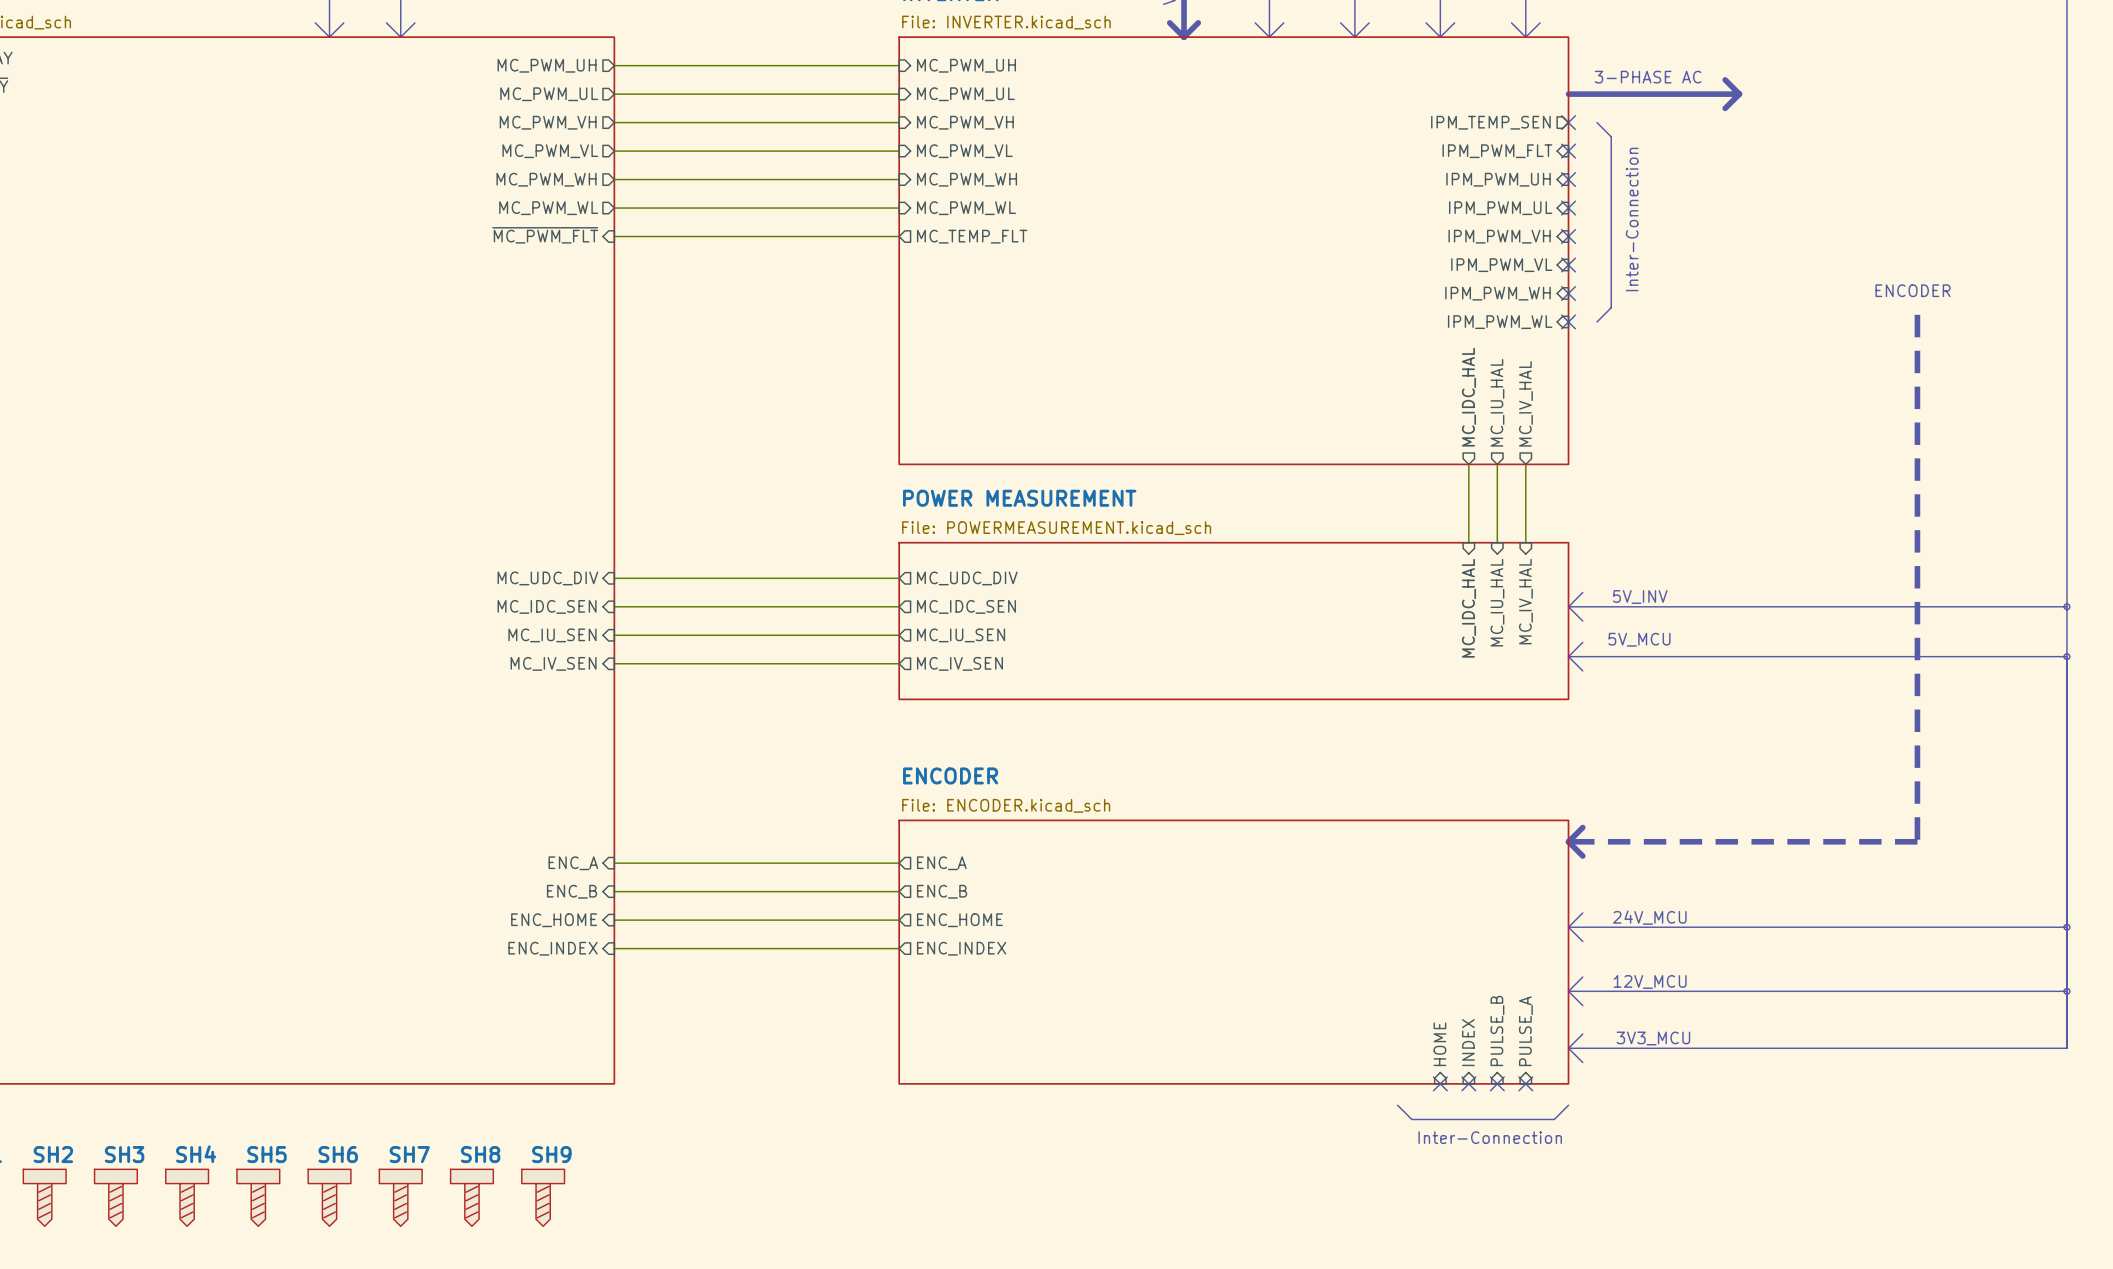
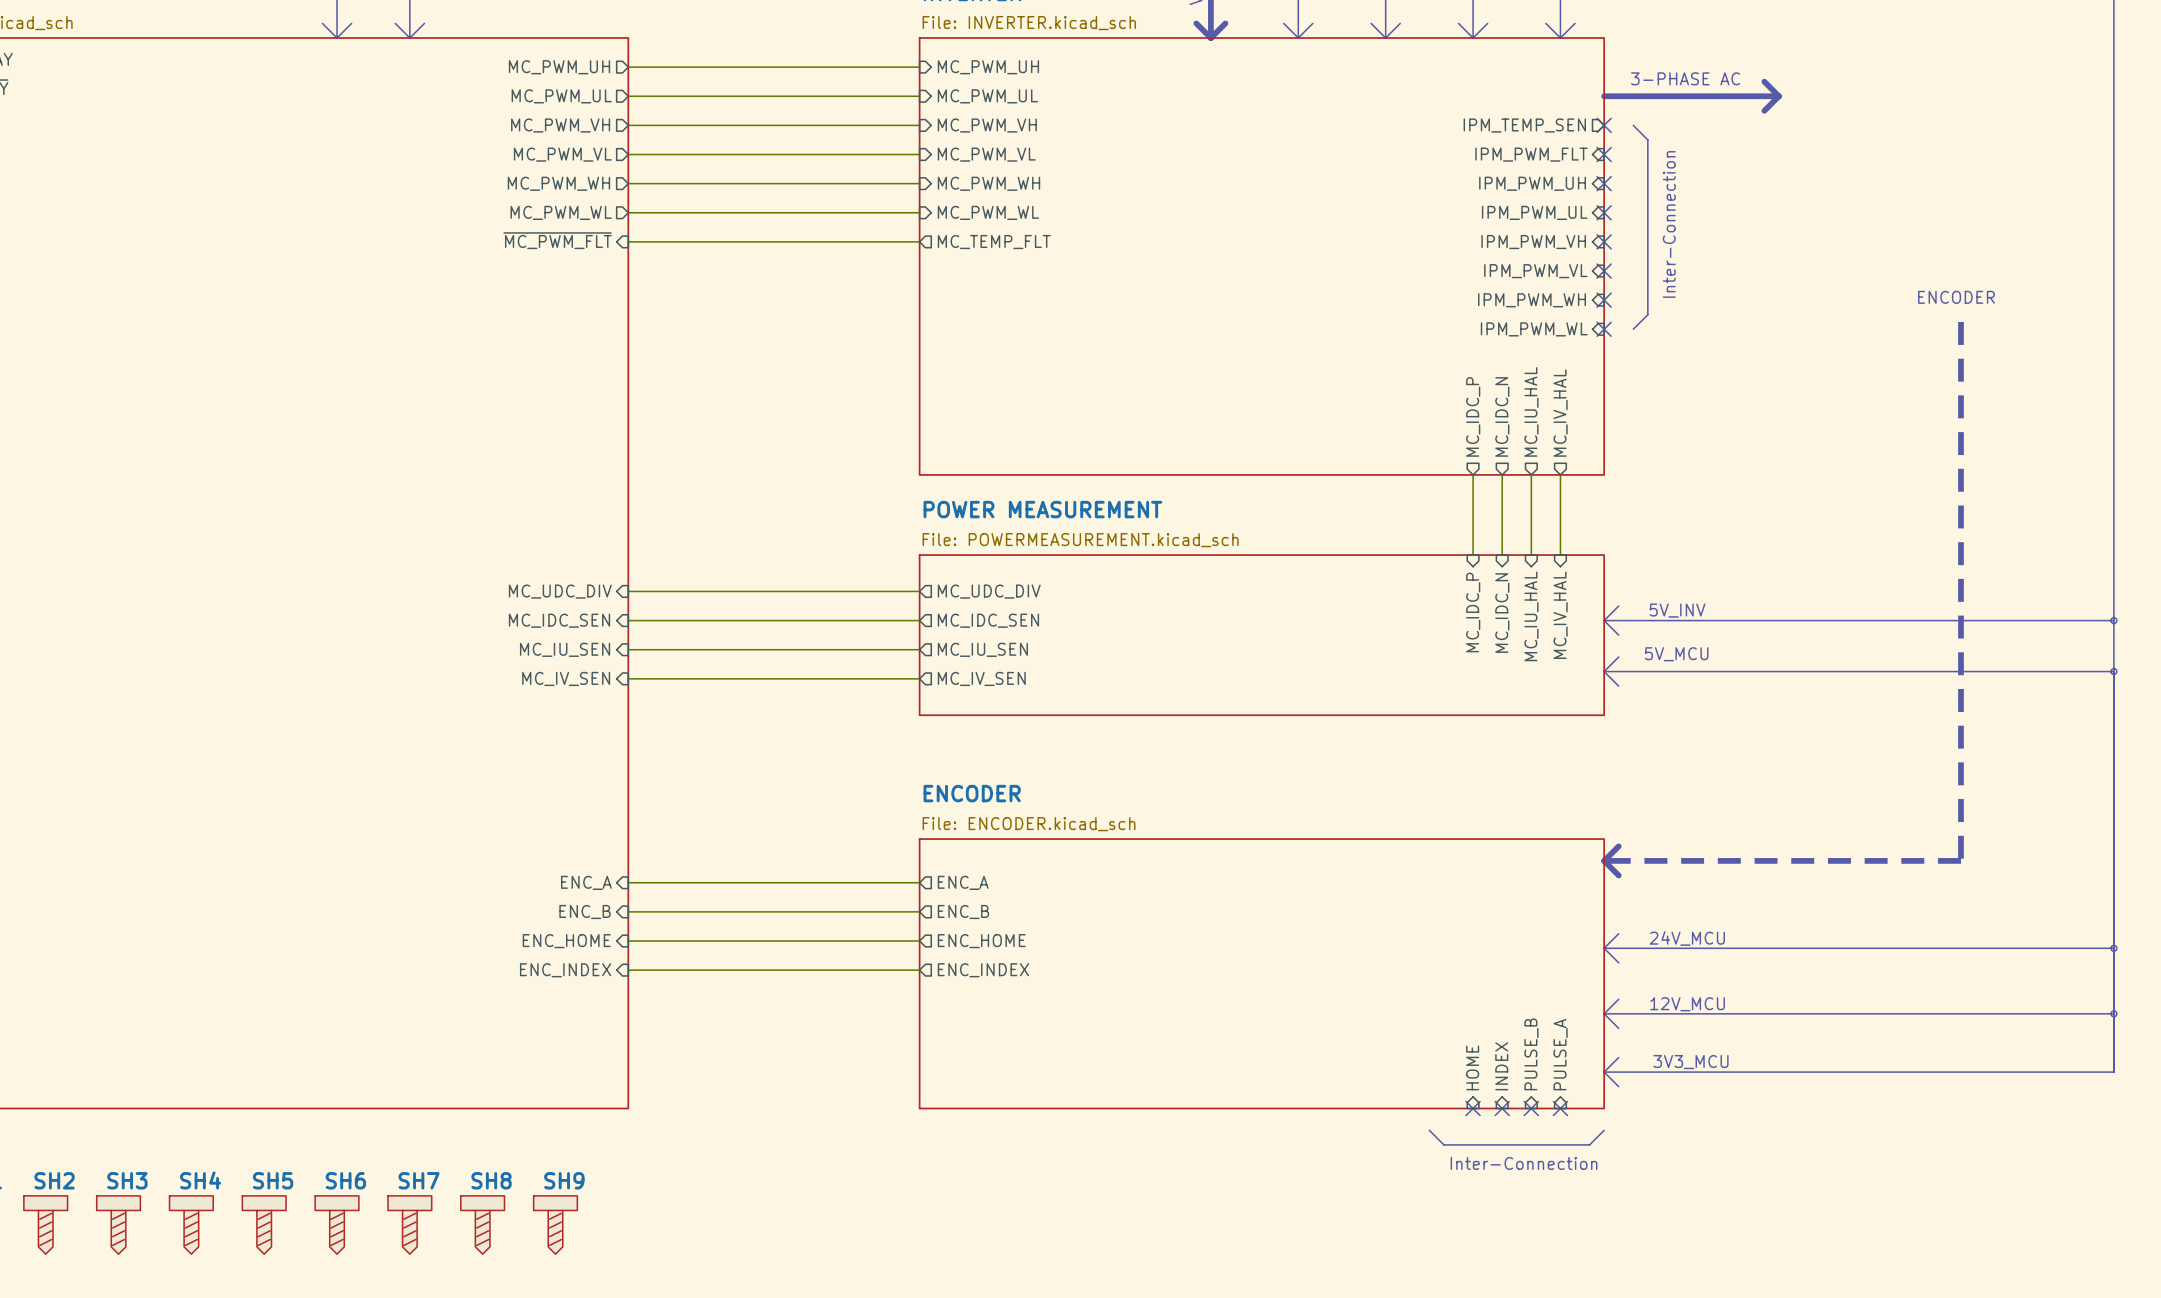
sheet pin: MC_IDC_HAL (1468, 397) -> MC_IDC_N (1502, 416)
sheet pin: none -> MC_IDC_P (1473, 416)
wire: none -> (1473, 474) (1473, 555)
sheet pin: none -> MC_IDC_P (1473, 612)
sheet pin: MC_IDC_HAL (1468, 608) -> MC_IDC_N (1502, 613)

